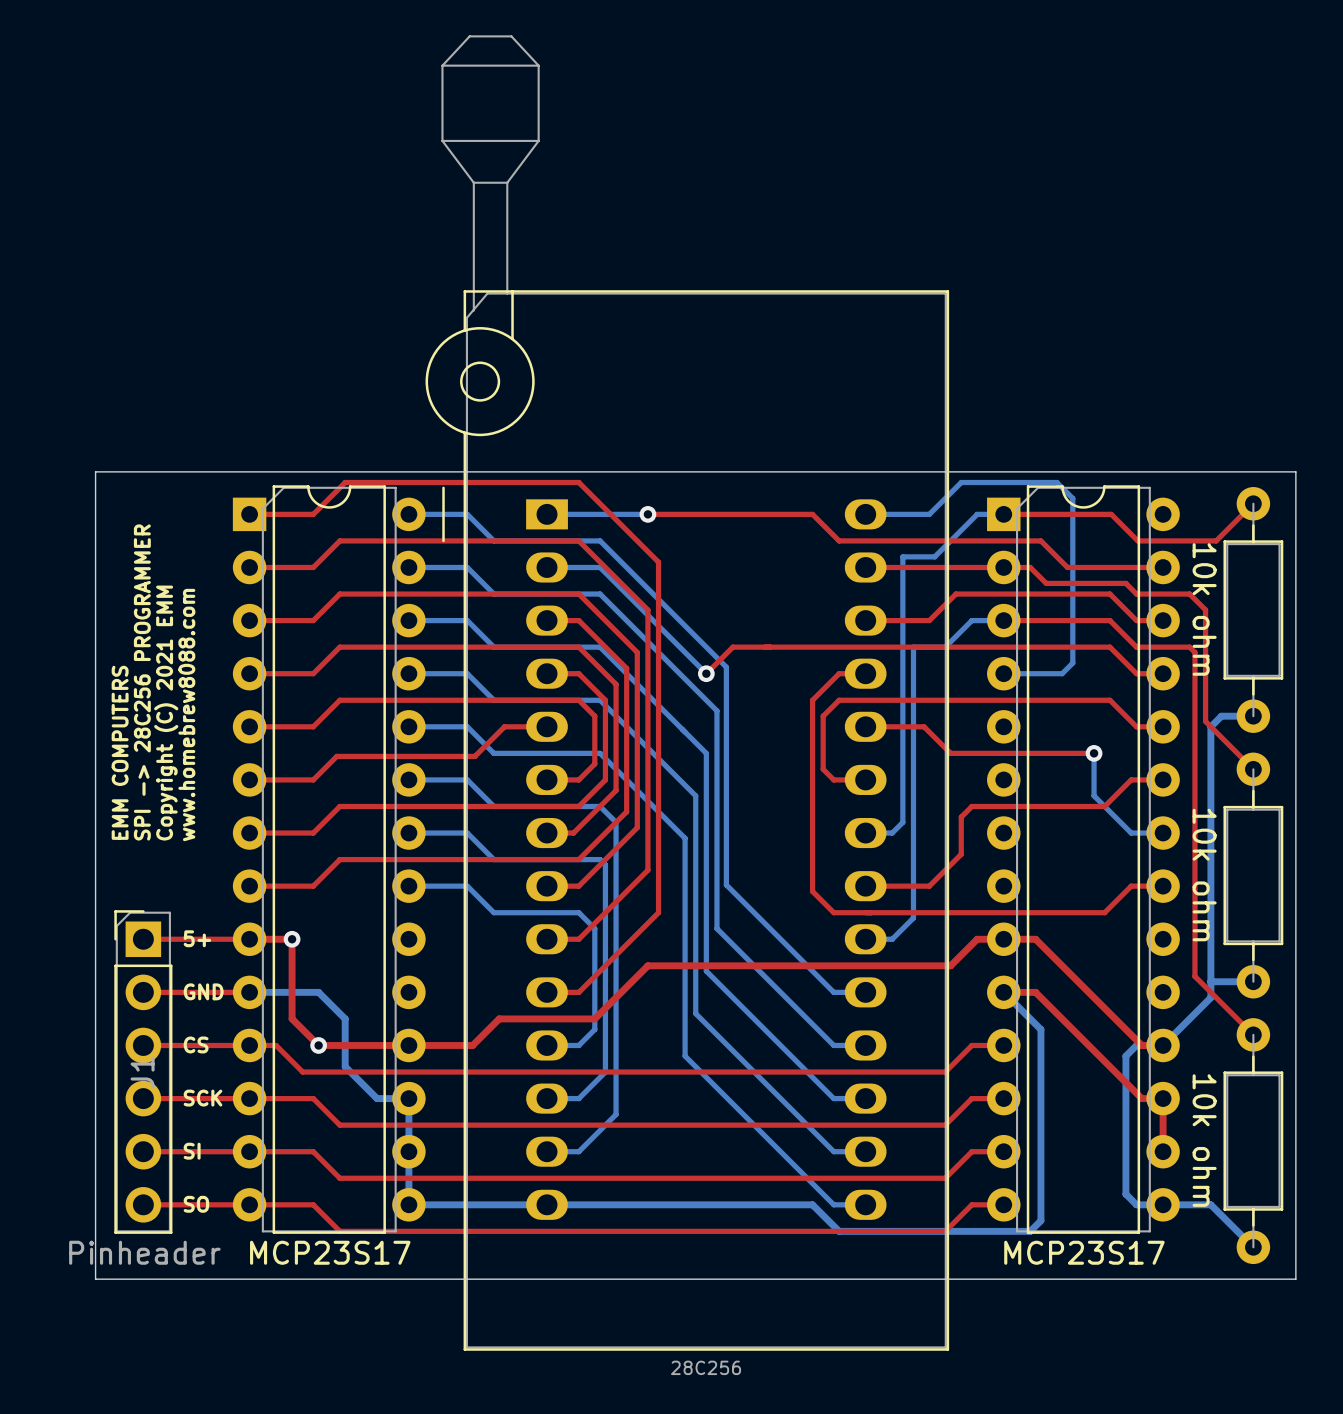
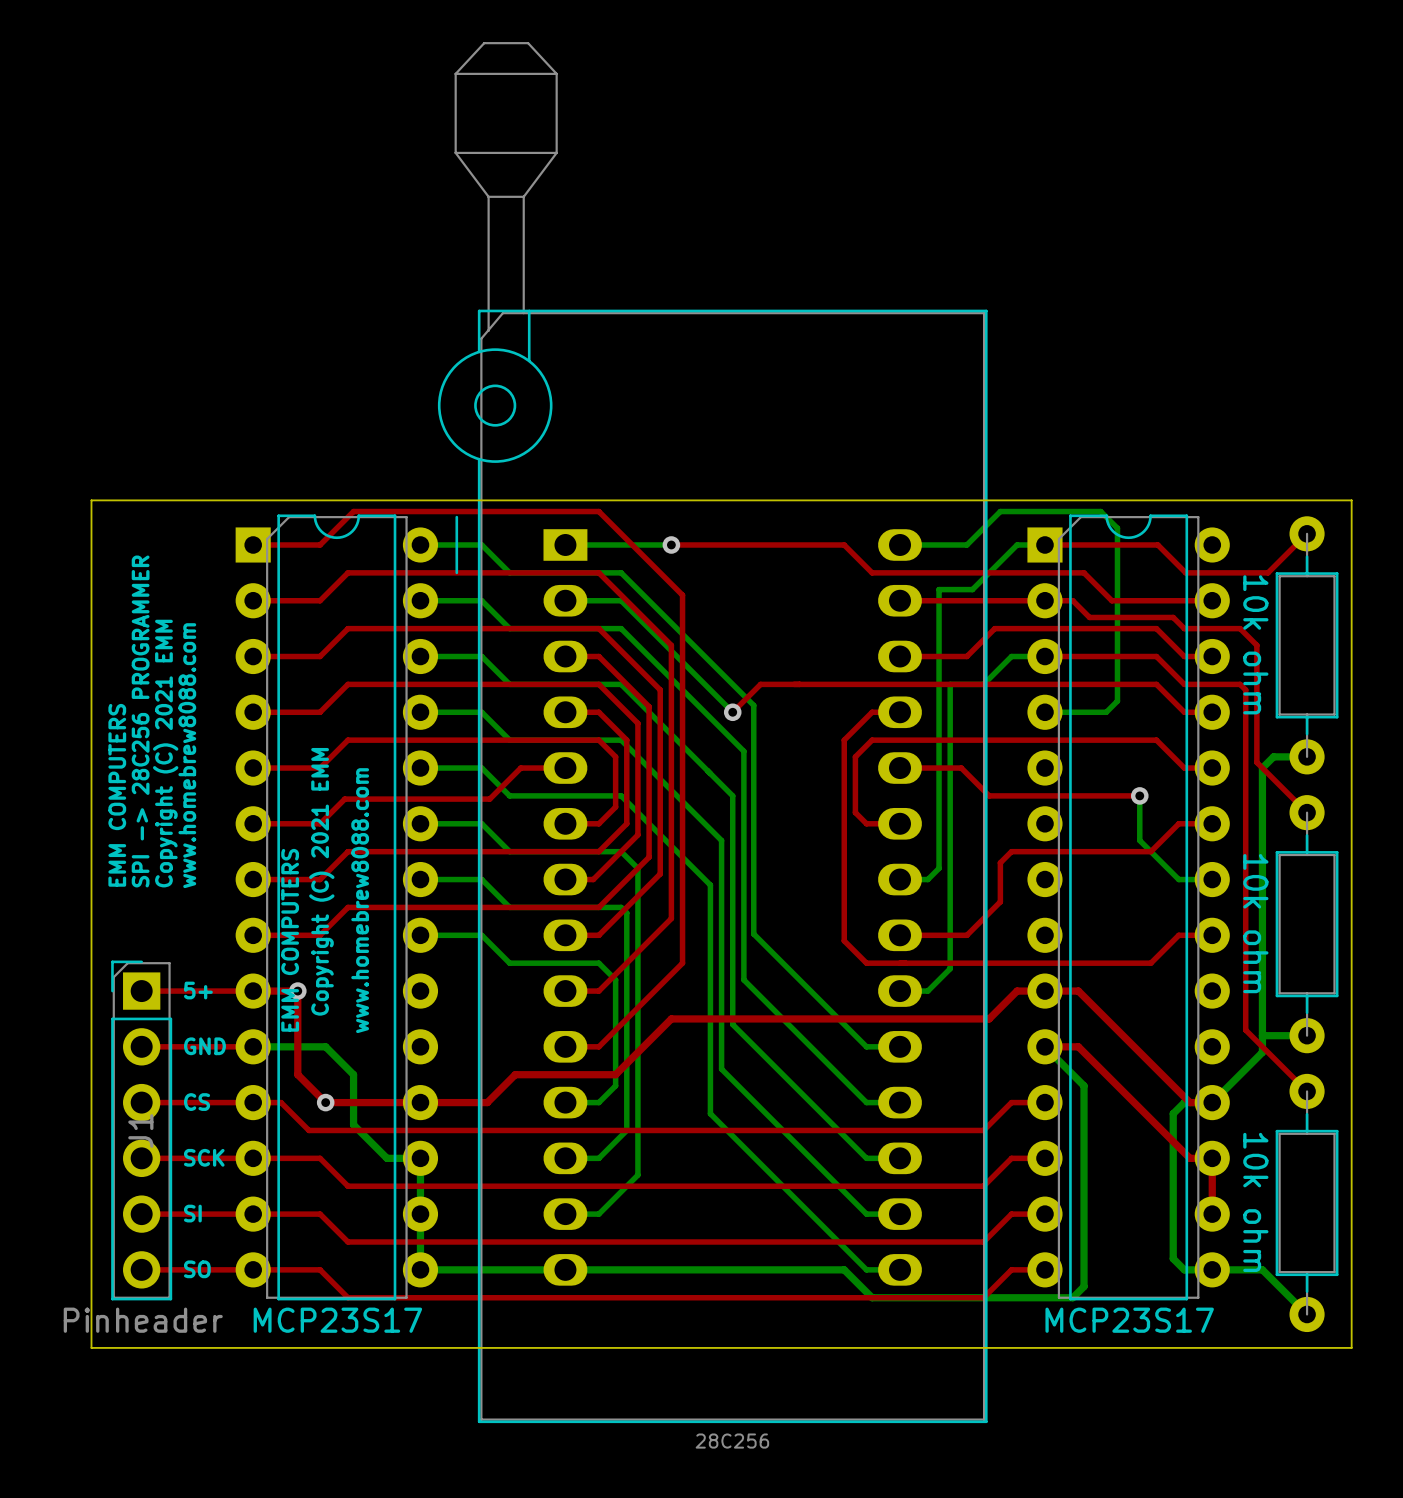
text: none -> Copyright (C) 2021 EMM (321, 881)
text: none -> www.homebrew8088.com (360, 900)
text: none -> EMM COMPUTERS (290, 940)

